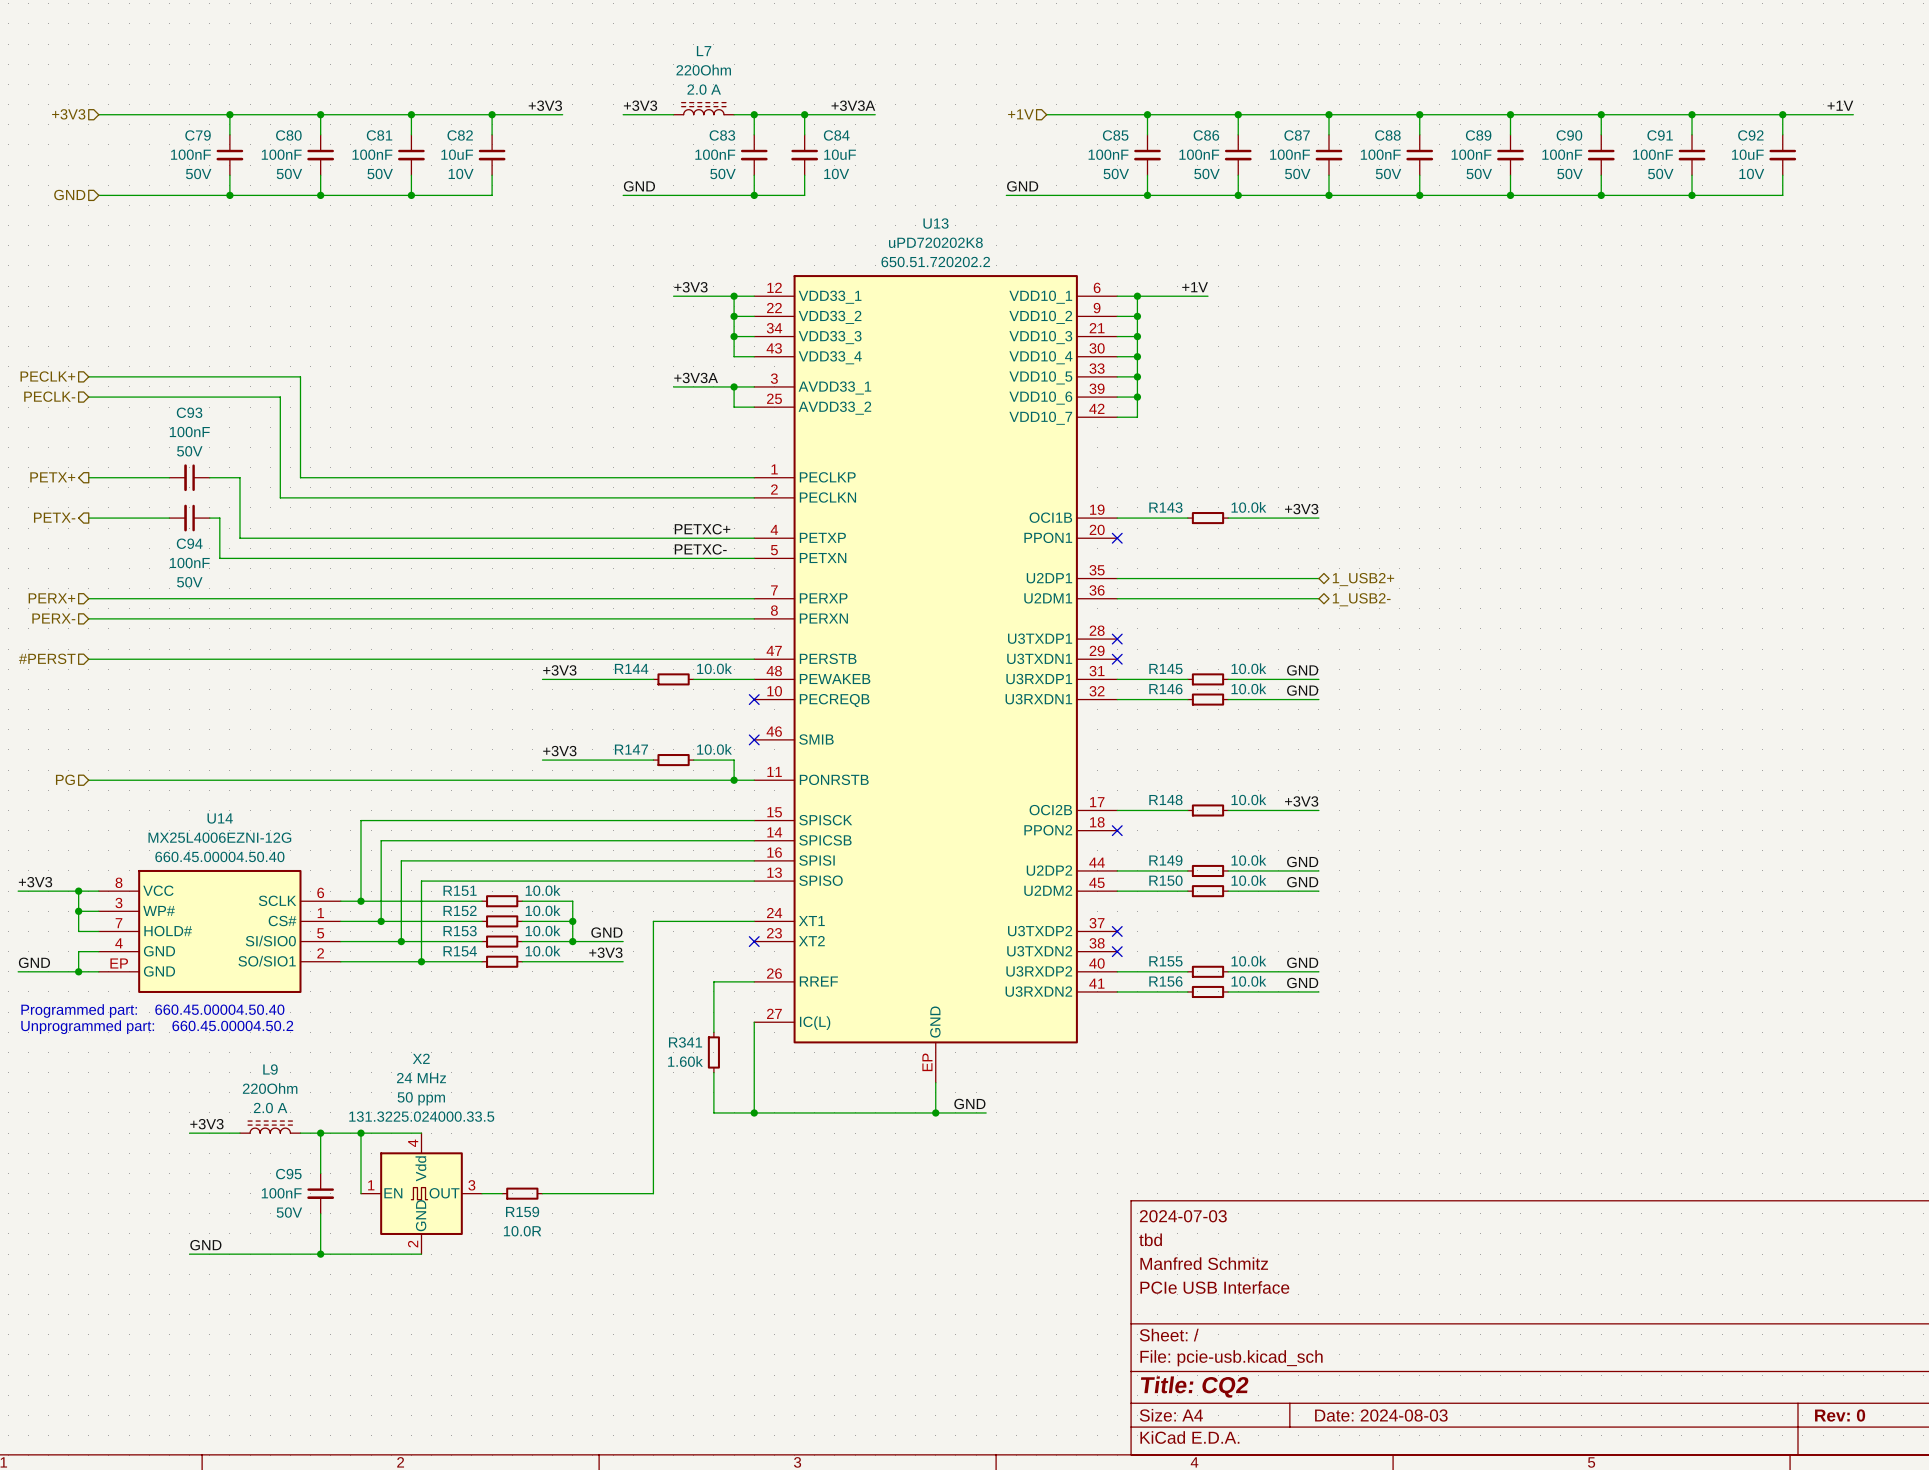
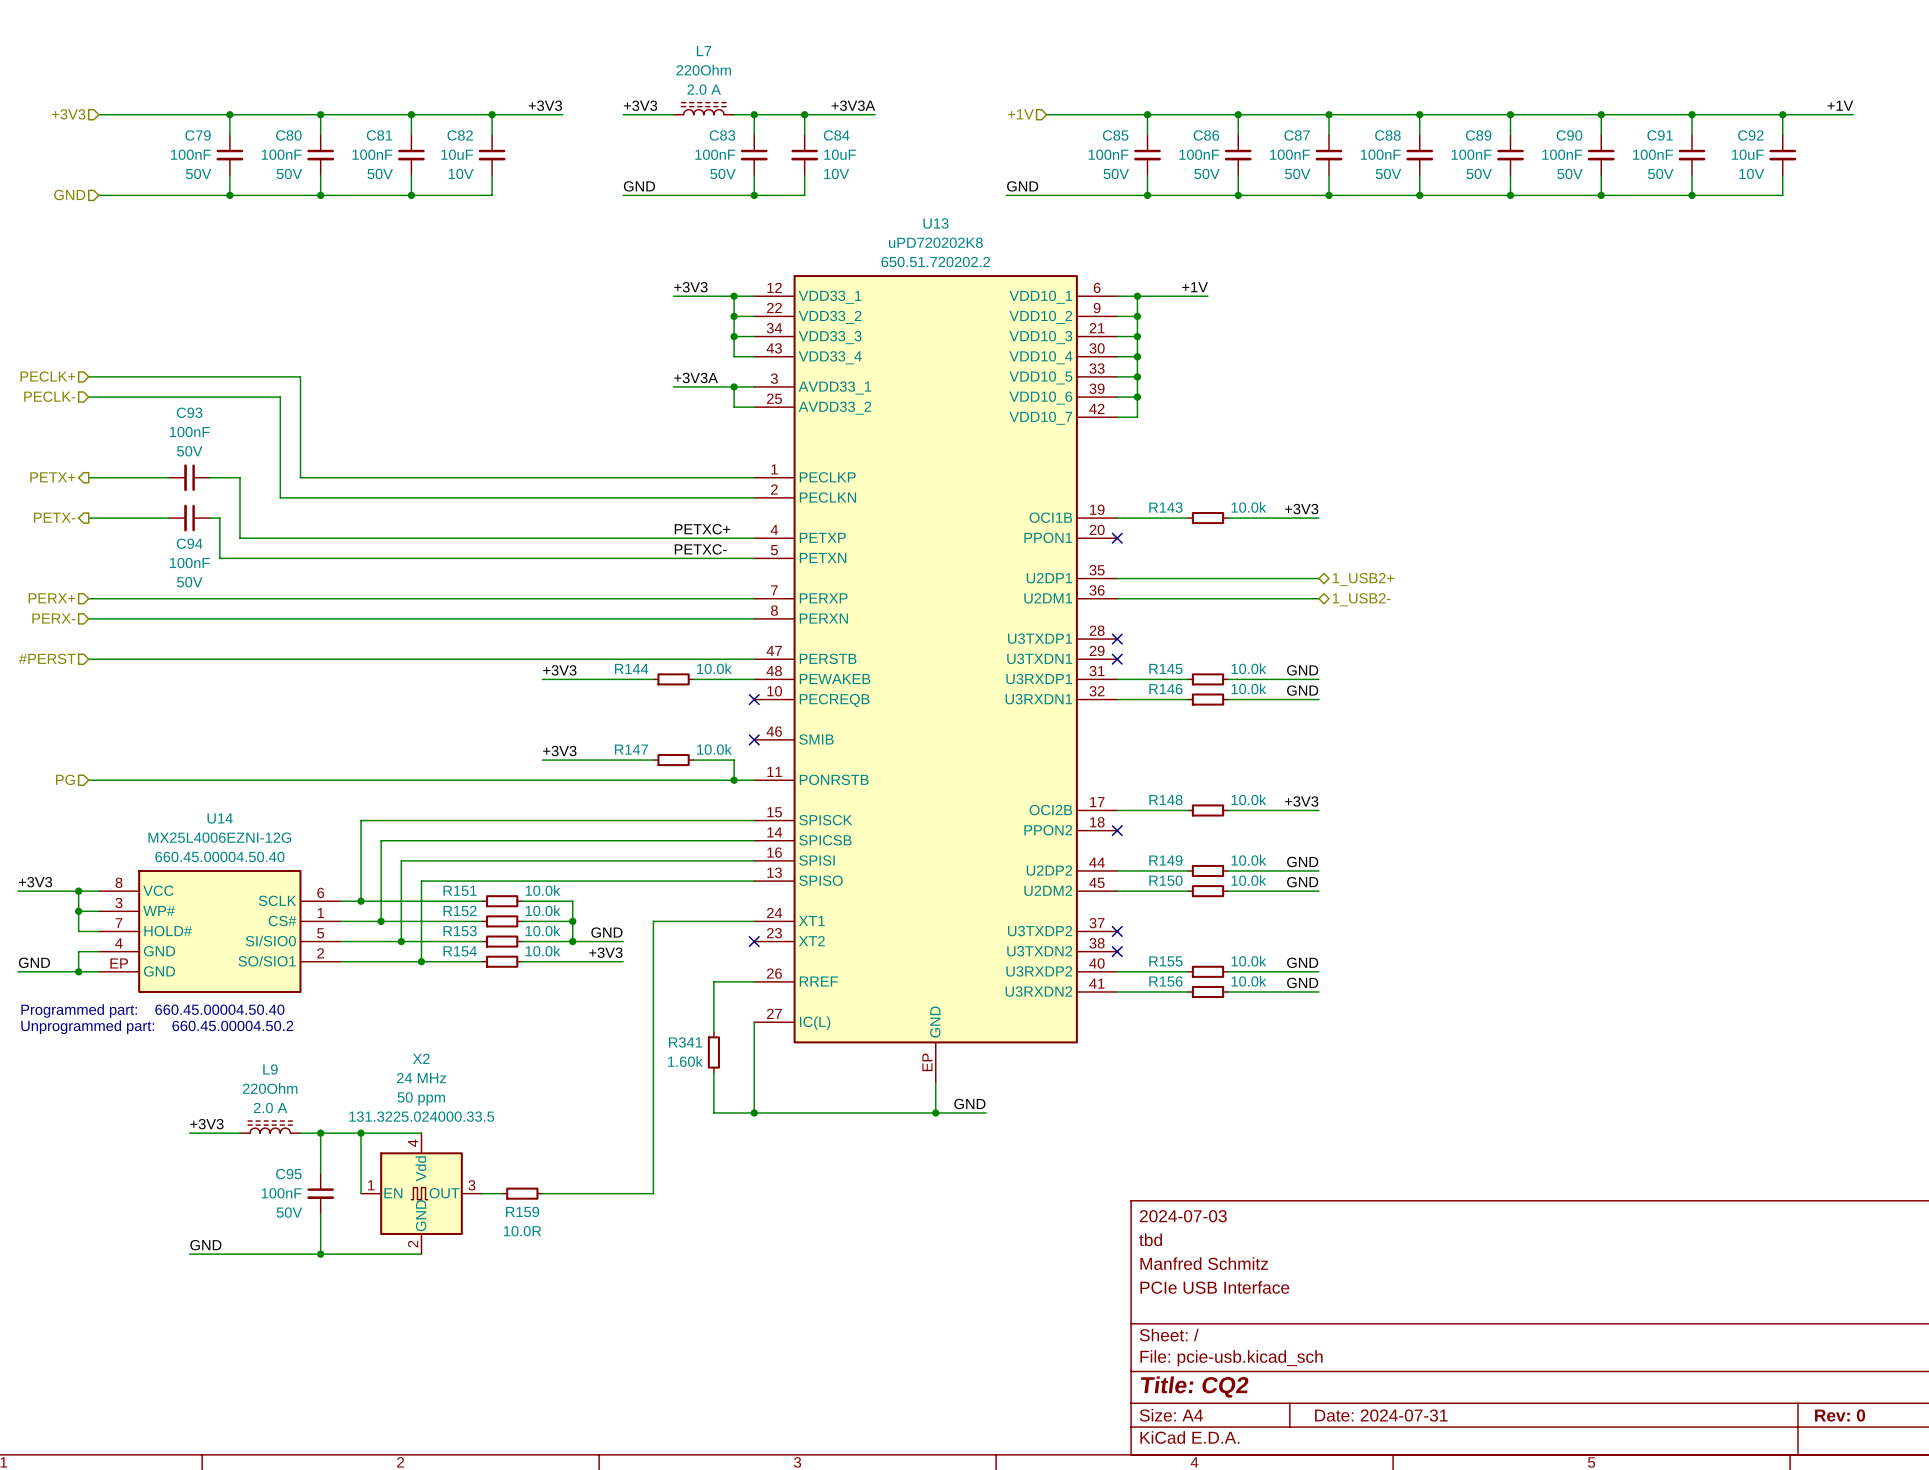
title block: Date: 2024-08-03 (1381, 1415) -> Date: 2024-07-31 (1381, 1415)

